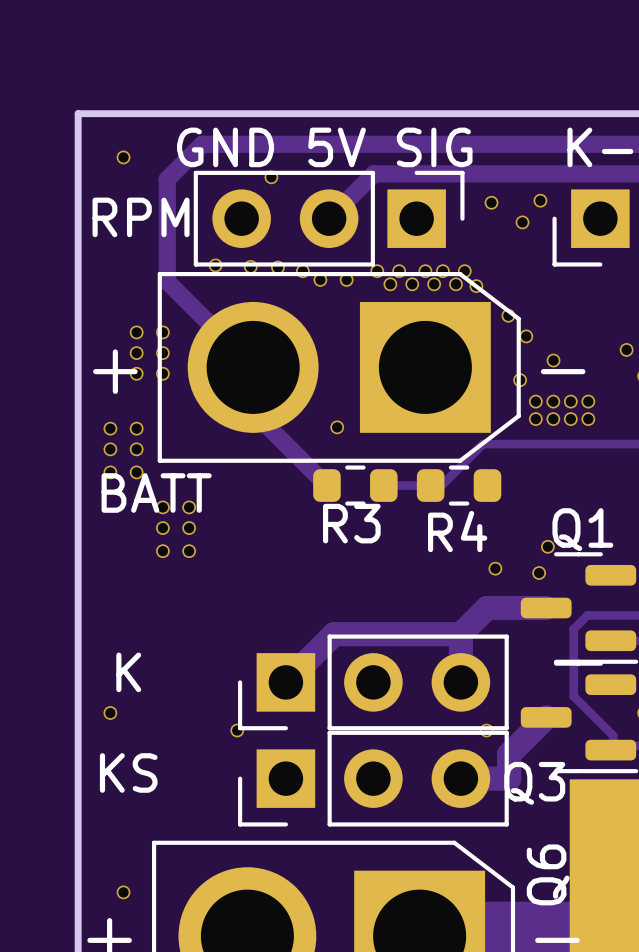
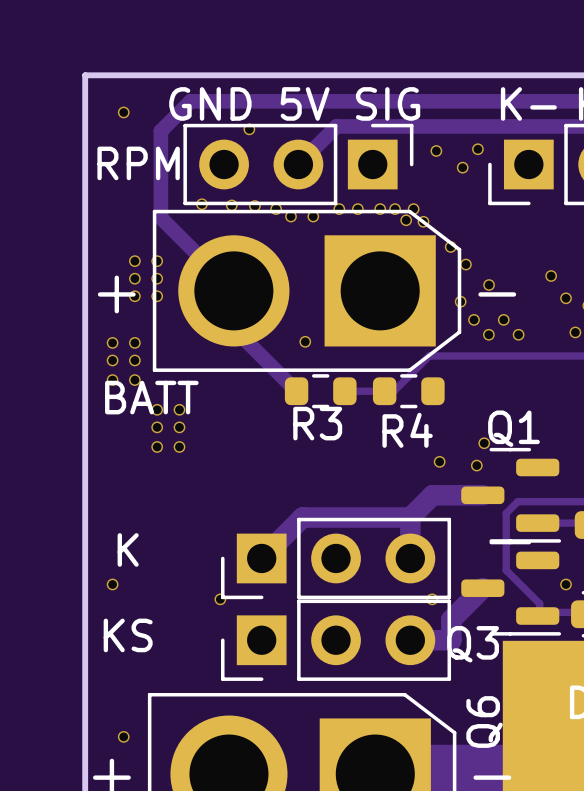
via: (390, 284) -> none
via: (412, 284) -> none
via: (434, 284) -> none
via: (553, 401) -> none
via: (588, 401) -> none
via: (535, 419) -> none
via: (570, 419) -> none

